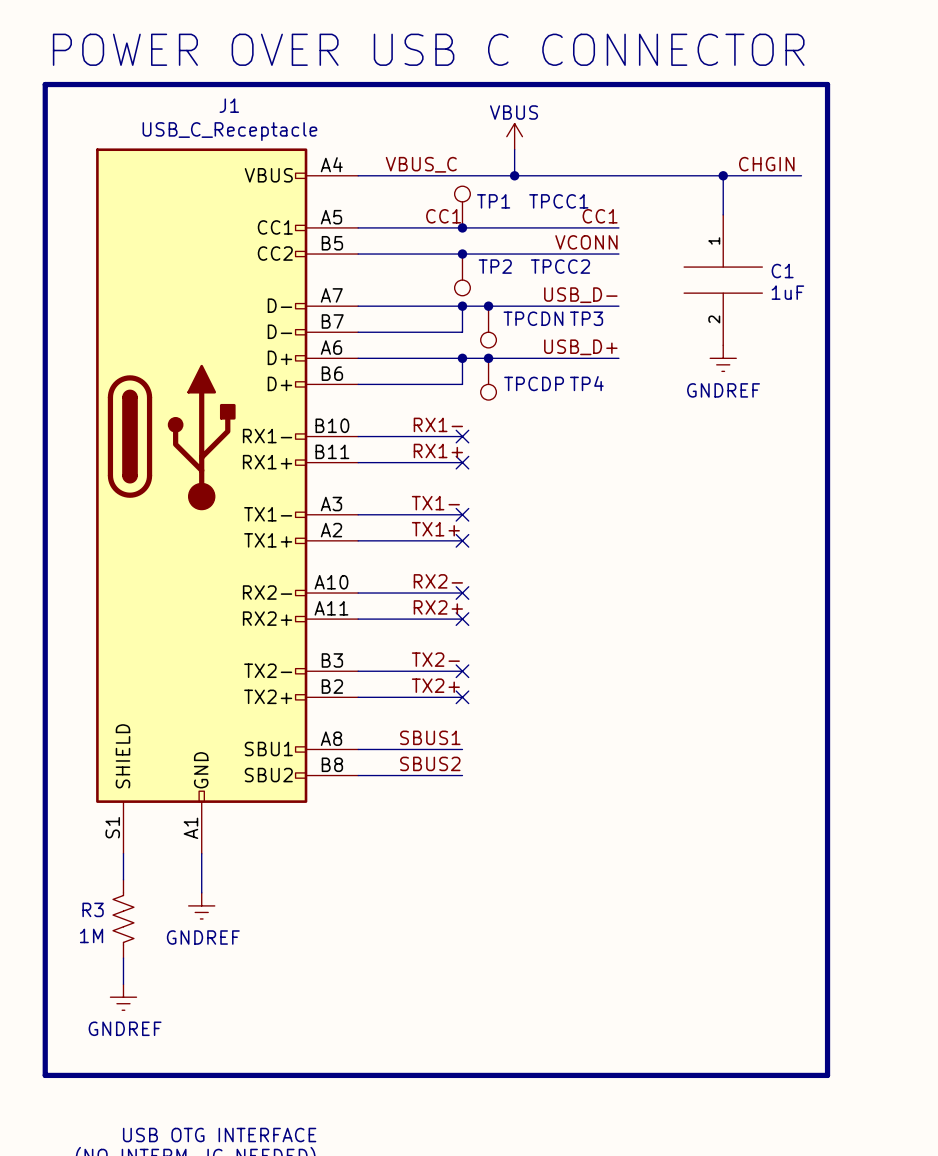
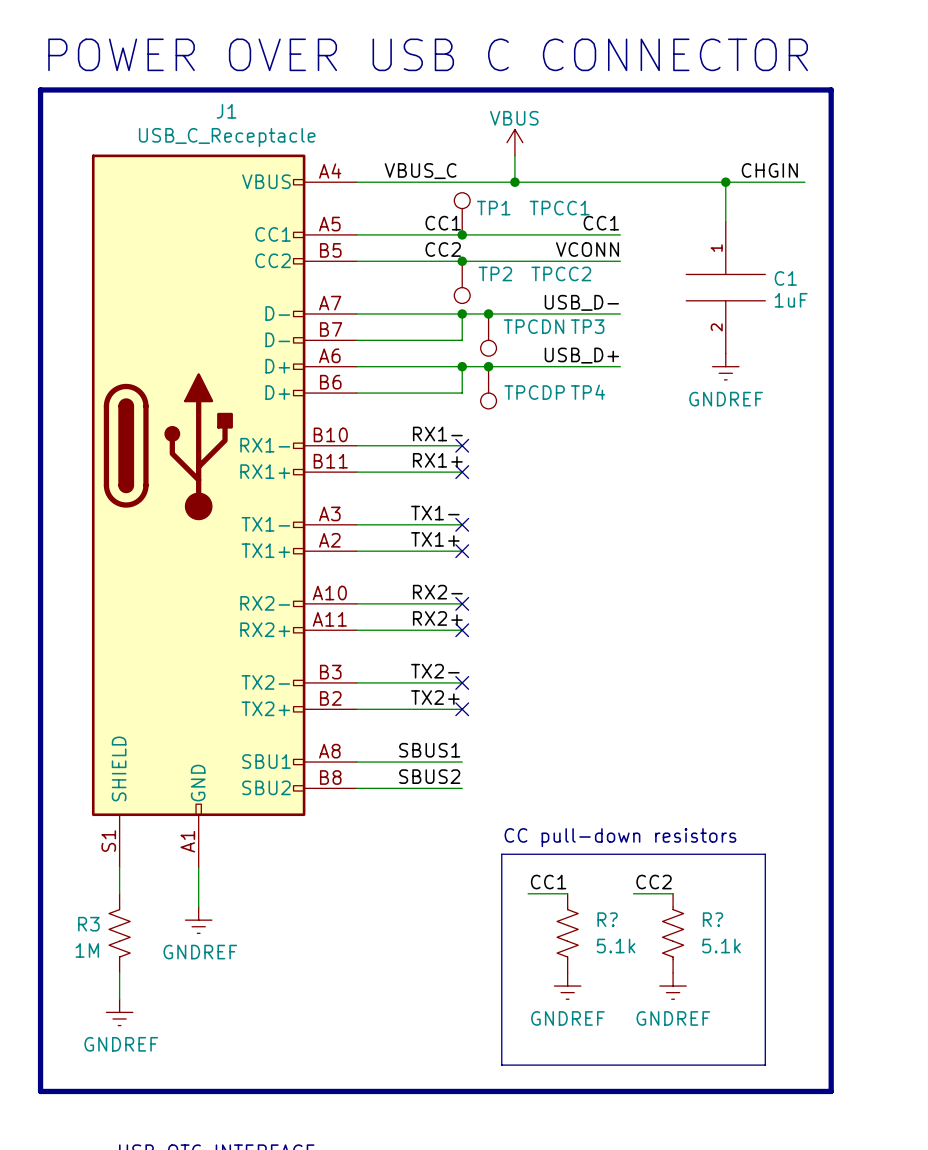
label: none -> CC2 (443, 249)
text: none -> CC pull-down resistors (620, 837)
line: none -> (501, 854) (501, 1065) (765, 1065) (765, 854) (501, 854)
label: none -> CC1 (548, 882)
label: none -> CC2 (654, 882)
wire: none -> (528, 893) (567, 893)
wire: none -> (633, 893) (673, 893)
R?: none -> 5.1k (567, 933)
R?: none -> 5.1k (673, 933)
power symbol: none -> GNDREF (567, 986)
power symbol: none -> GNDREF (673, 986)

